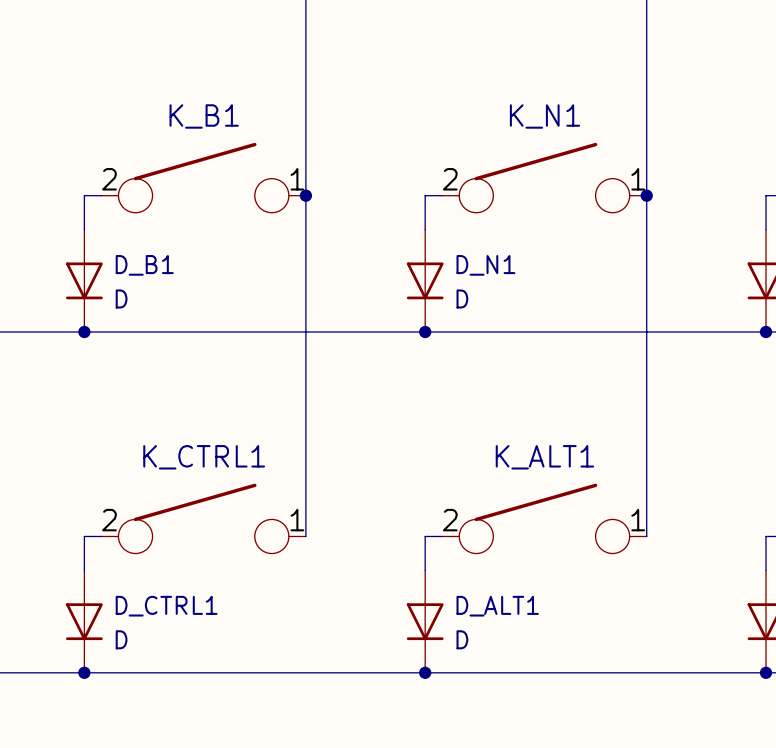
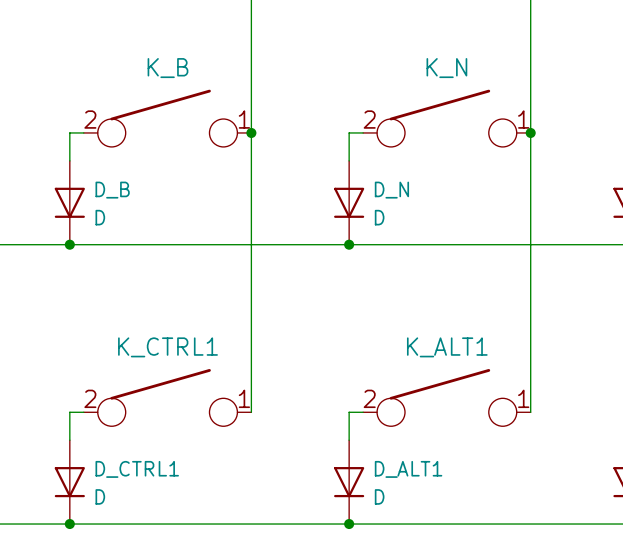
K_B1 name: K_B1 (204, 116) -> K_B (167, 68)
K_N1 name: K_N1 (544, 116) -> K_N (446, 68)
D_B1 name: D_B1 (144, 265) -> D_B (112, 190)
D_N1 name: D_N1 (485, 265) -> D_N (391, 190)

